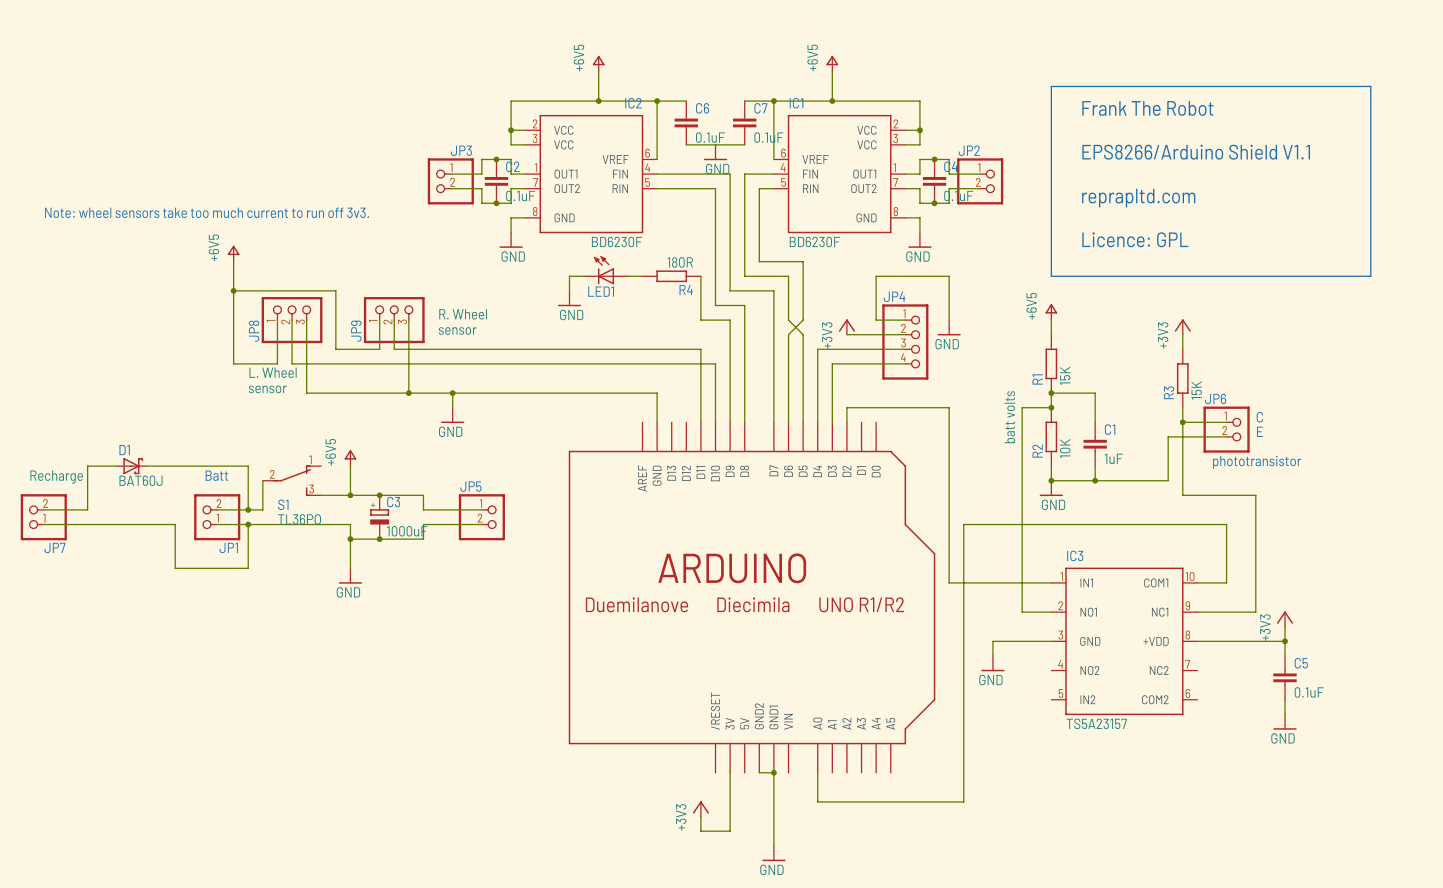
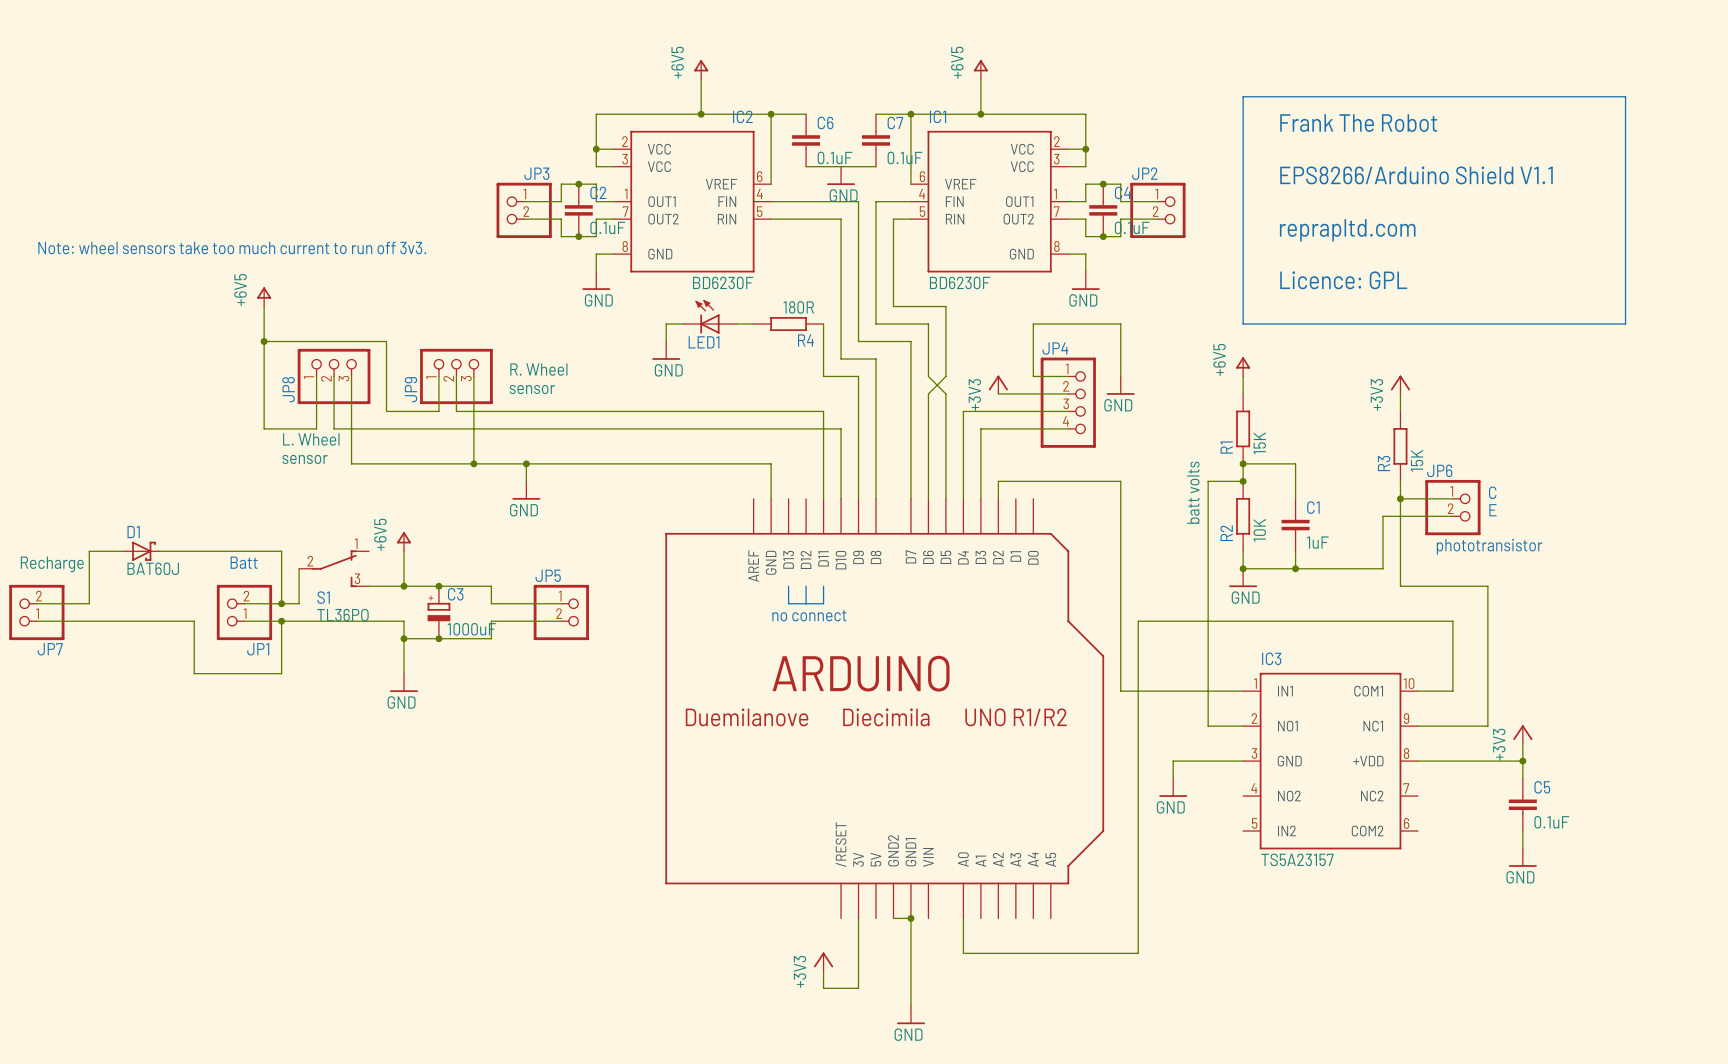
line: none -> (788, 586) (788, 603) (823, 603) (823, 586)
line: none -> (806, 586) (806, 603)
text: none -> no connect (809, 615)

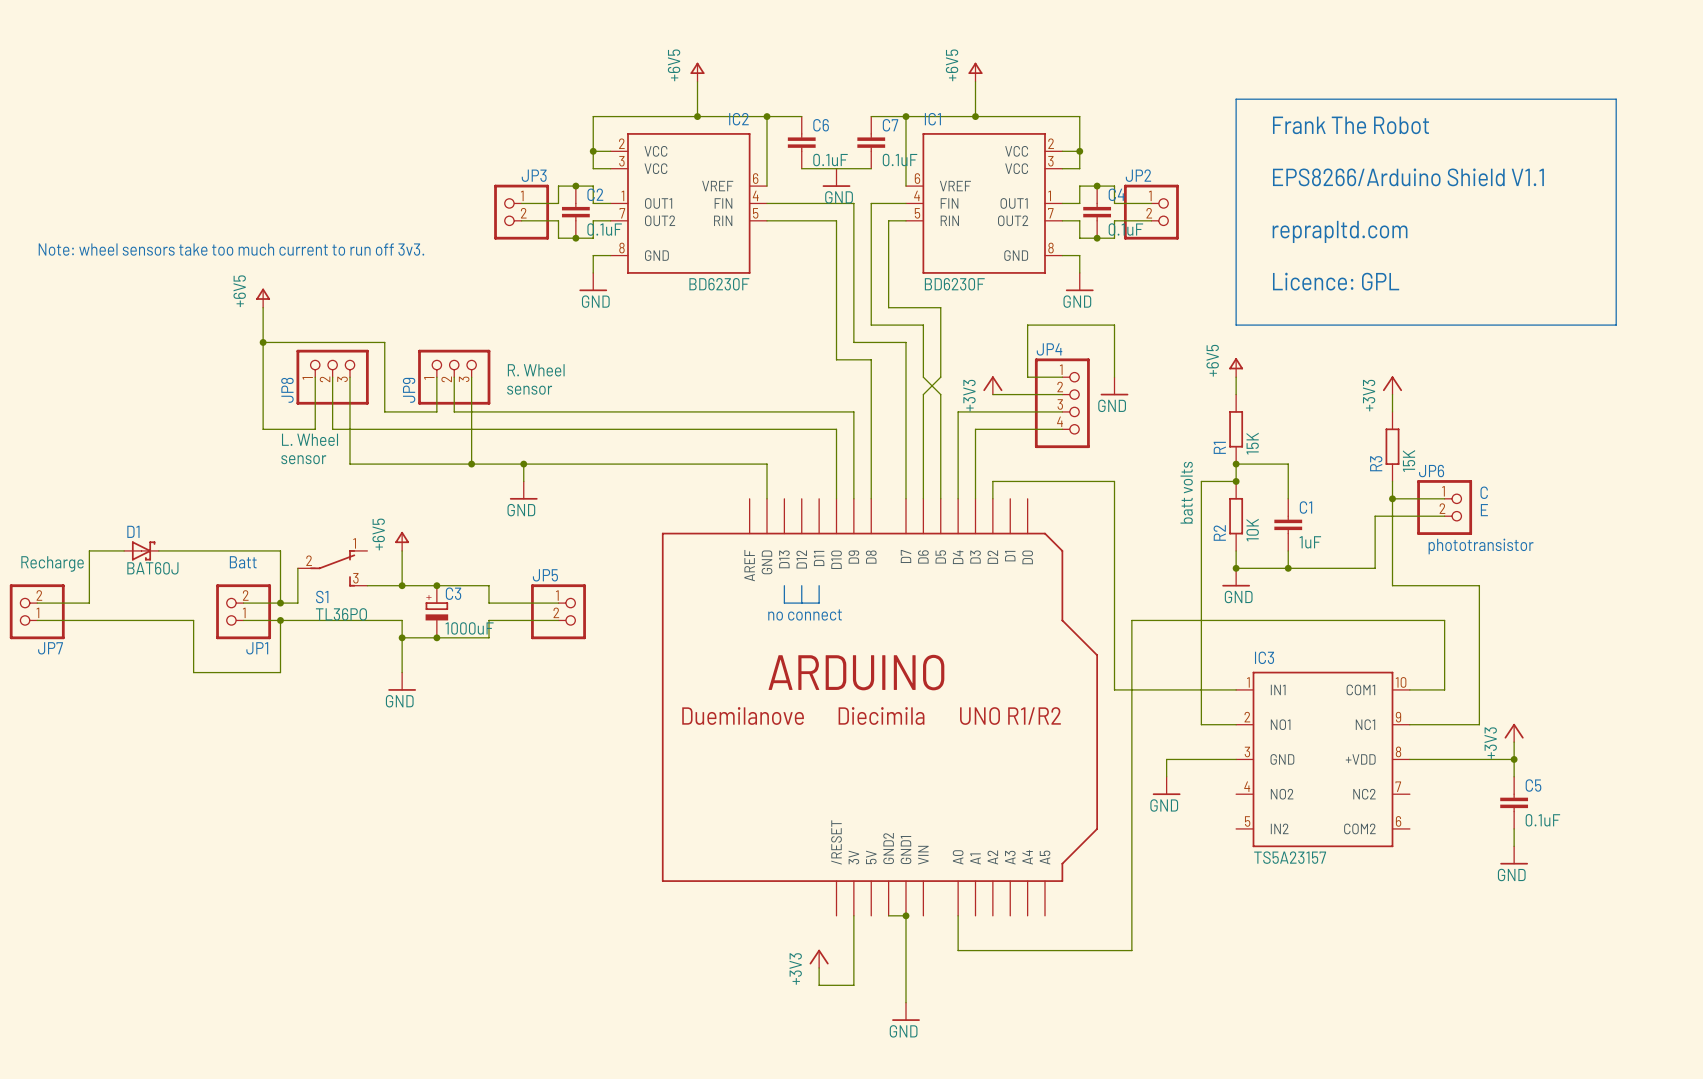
LED1: (709, 316) -> none
wire: (683, 324) (666, 324) (666, 341) -> none
wire: (736, 324) (753, 324) -> none
R4: 180R (788, 324) -> none
wire: (823, 324) (823, 376) (858, 376) (858, 411) -> (819, 411) (853, 411)
power symbol: GND (666, 350) -> none
wire: (823, 411) (823, 498) -> none

